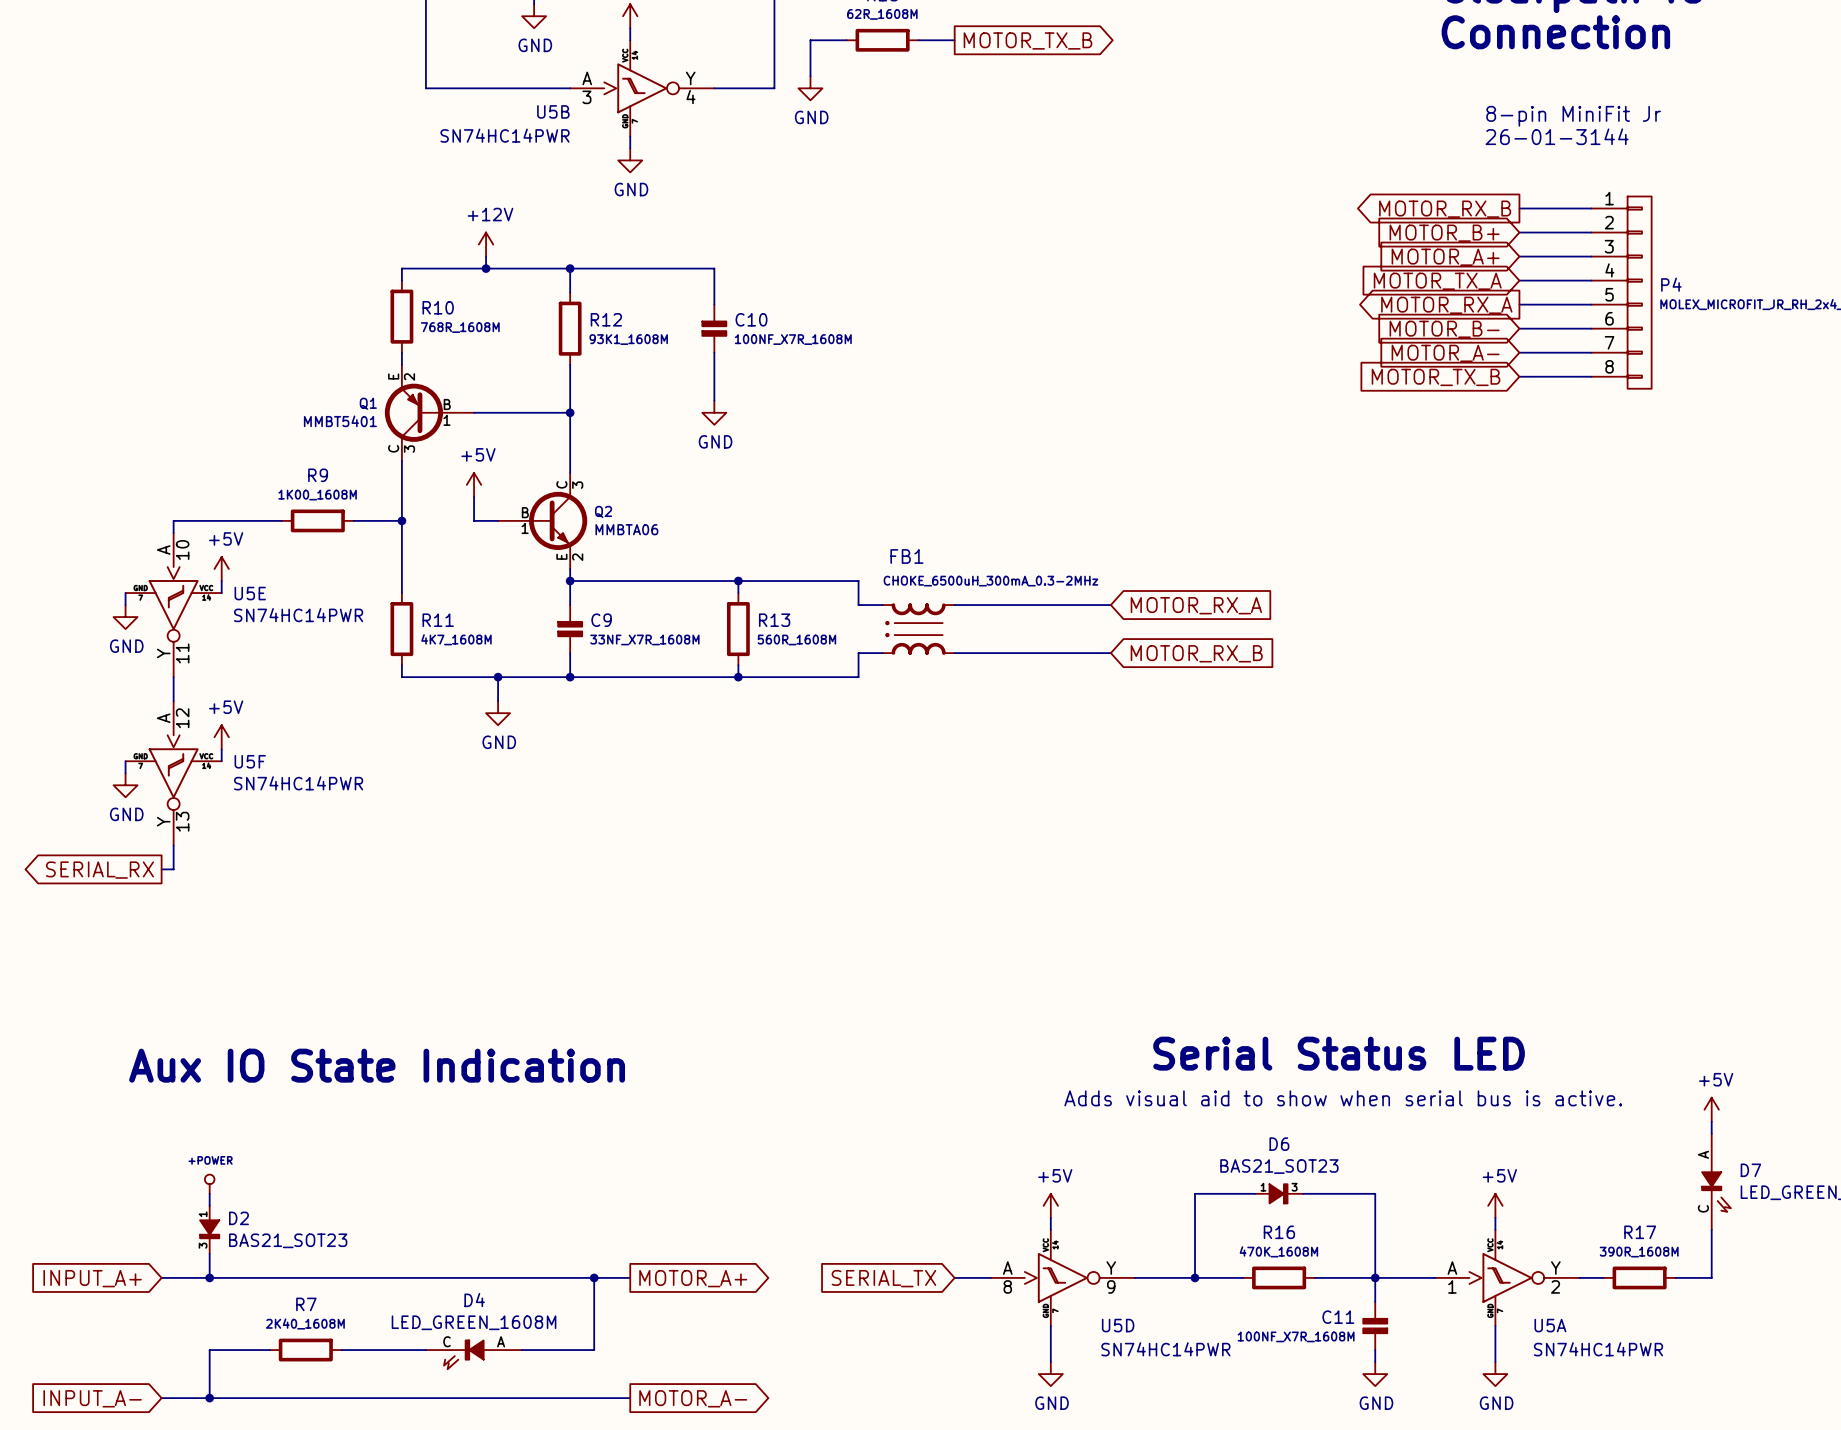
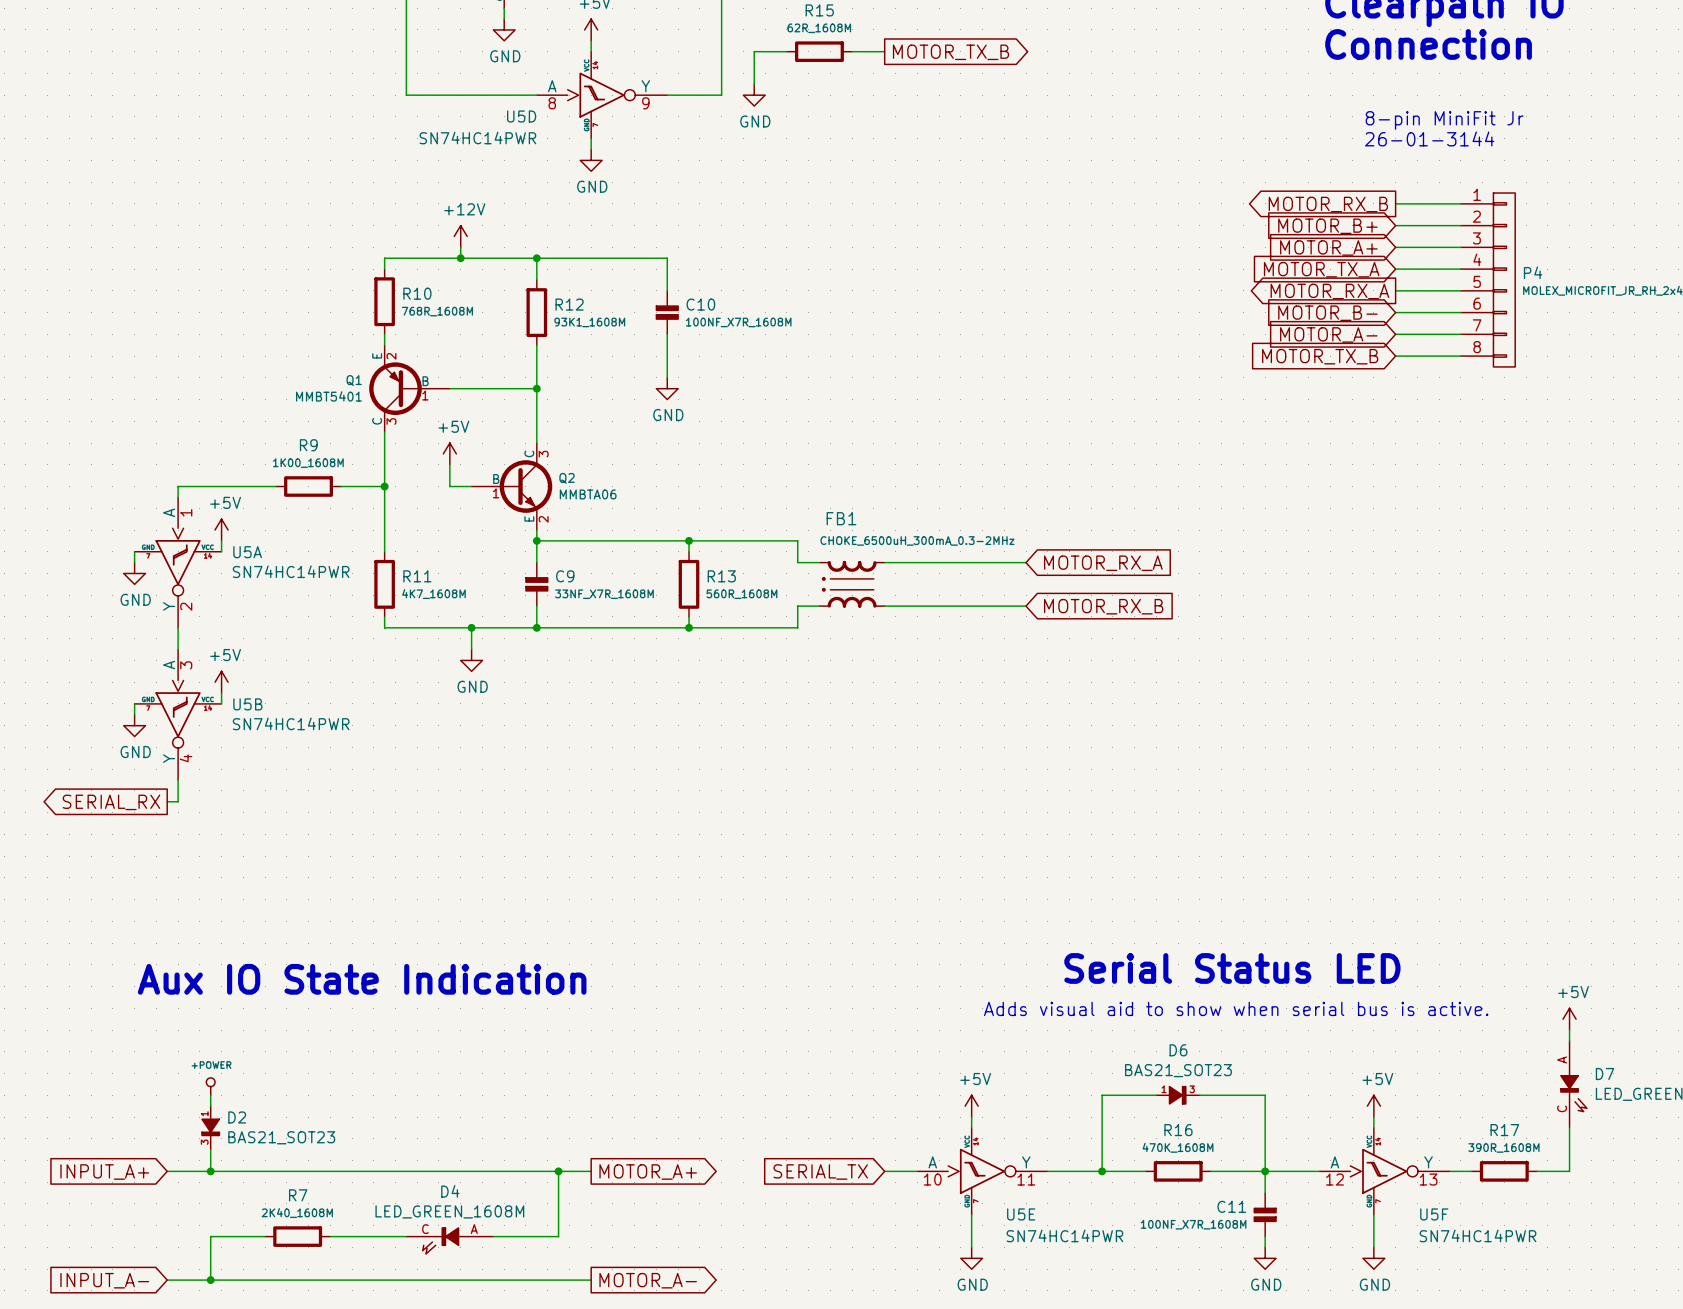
U5B rotation: 0° (642, 88) -> 90° clockwise (178, 714)
U5B position: (642, 88) -> (178, 714)
U5B name position: U5B (553, 111) -> U5B (247, 704)
U5E name position: U5E (250, 593) -> U5E (1021, 1214)
U5E rotation: 0° (173, 605) -> 90° counterclockwise (982, 1171)
U5E position: (173, 605) -> (982, 1171)
U5E value position: SN74HC14PWR (298, 615) -> SN74HC14PWR (1064, 1235)
U5F name position: U5F (250, 761) -> U5F (1434, 1214)
U5F rotation: 0° (173, 773) -> 90° counterclockwise (1384, 1171)
U5F position: (173, 773) -> (1384, 1171)
U5F value position: SN74HC14PWR (298, 783) -> SN74HC14PWR (1478, 1235)
U5D position: (1062, 1277) -> (602, 95)
U5A rotation: 0° (1507, 1277) -> 90° clockwise (178, 562)
U5A position: (1507, 1277) -> (178, 562)
U5D name position: U5D (1118, 1325) -> U5D (521, 116)
U5A name position: U5A (1550, 1325) -> U5A (247, 552)
U5D value position: SN74HC14PWR (1165, 1349) -> SN74HC14PWR (477, 137)
U5A value position: SN74HC14PWR (1598, 1349) -> SN74HC14PWR (291, 571)

